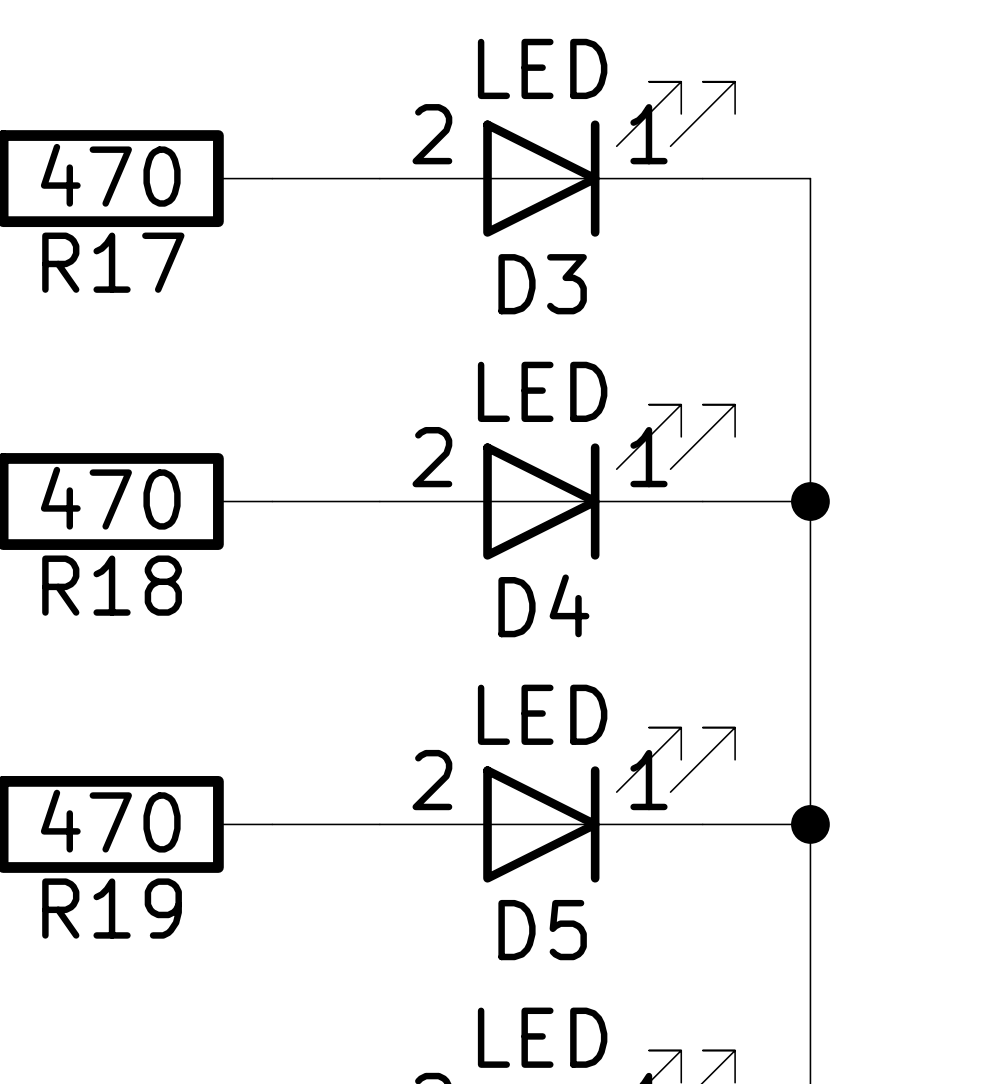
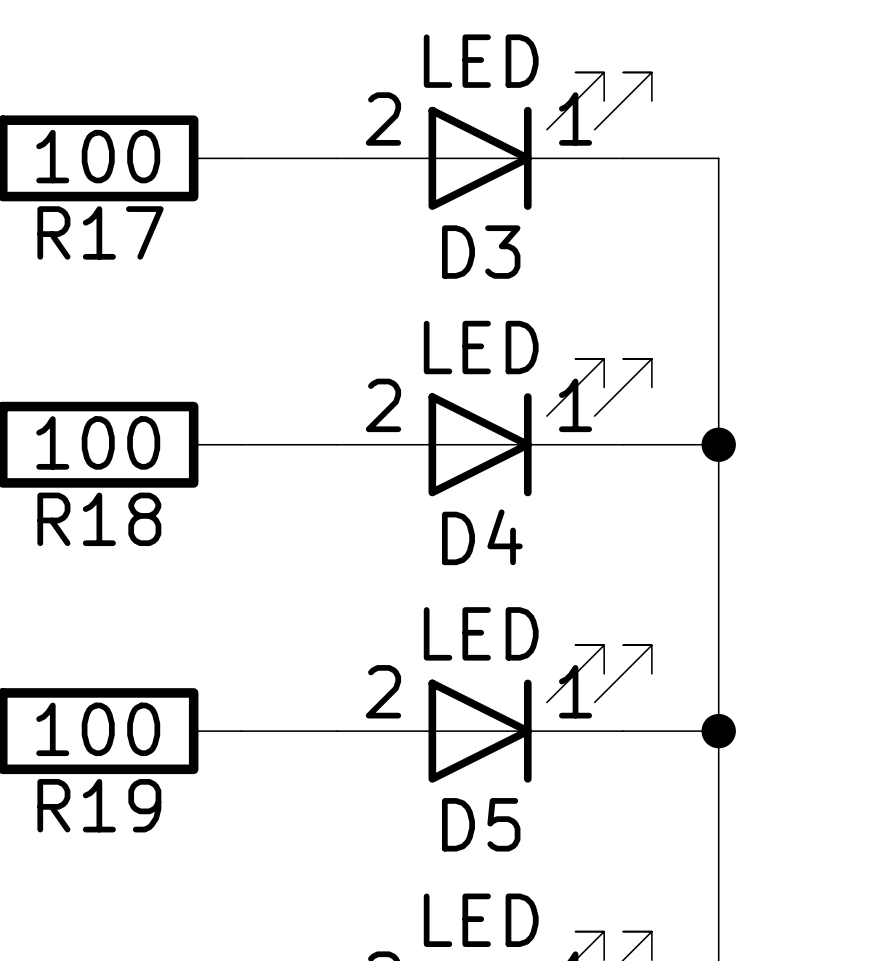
R17 value: 470 (110, 175) -> 100 (98, 156)
R18 value: 470 (110, 498) -> 100 (98, 442)
R19 value: 470 (110, 821) -> 100 (98, 729)

